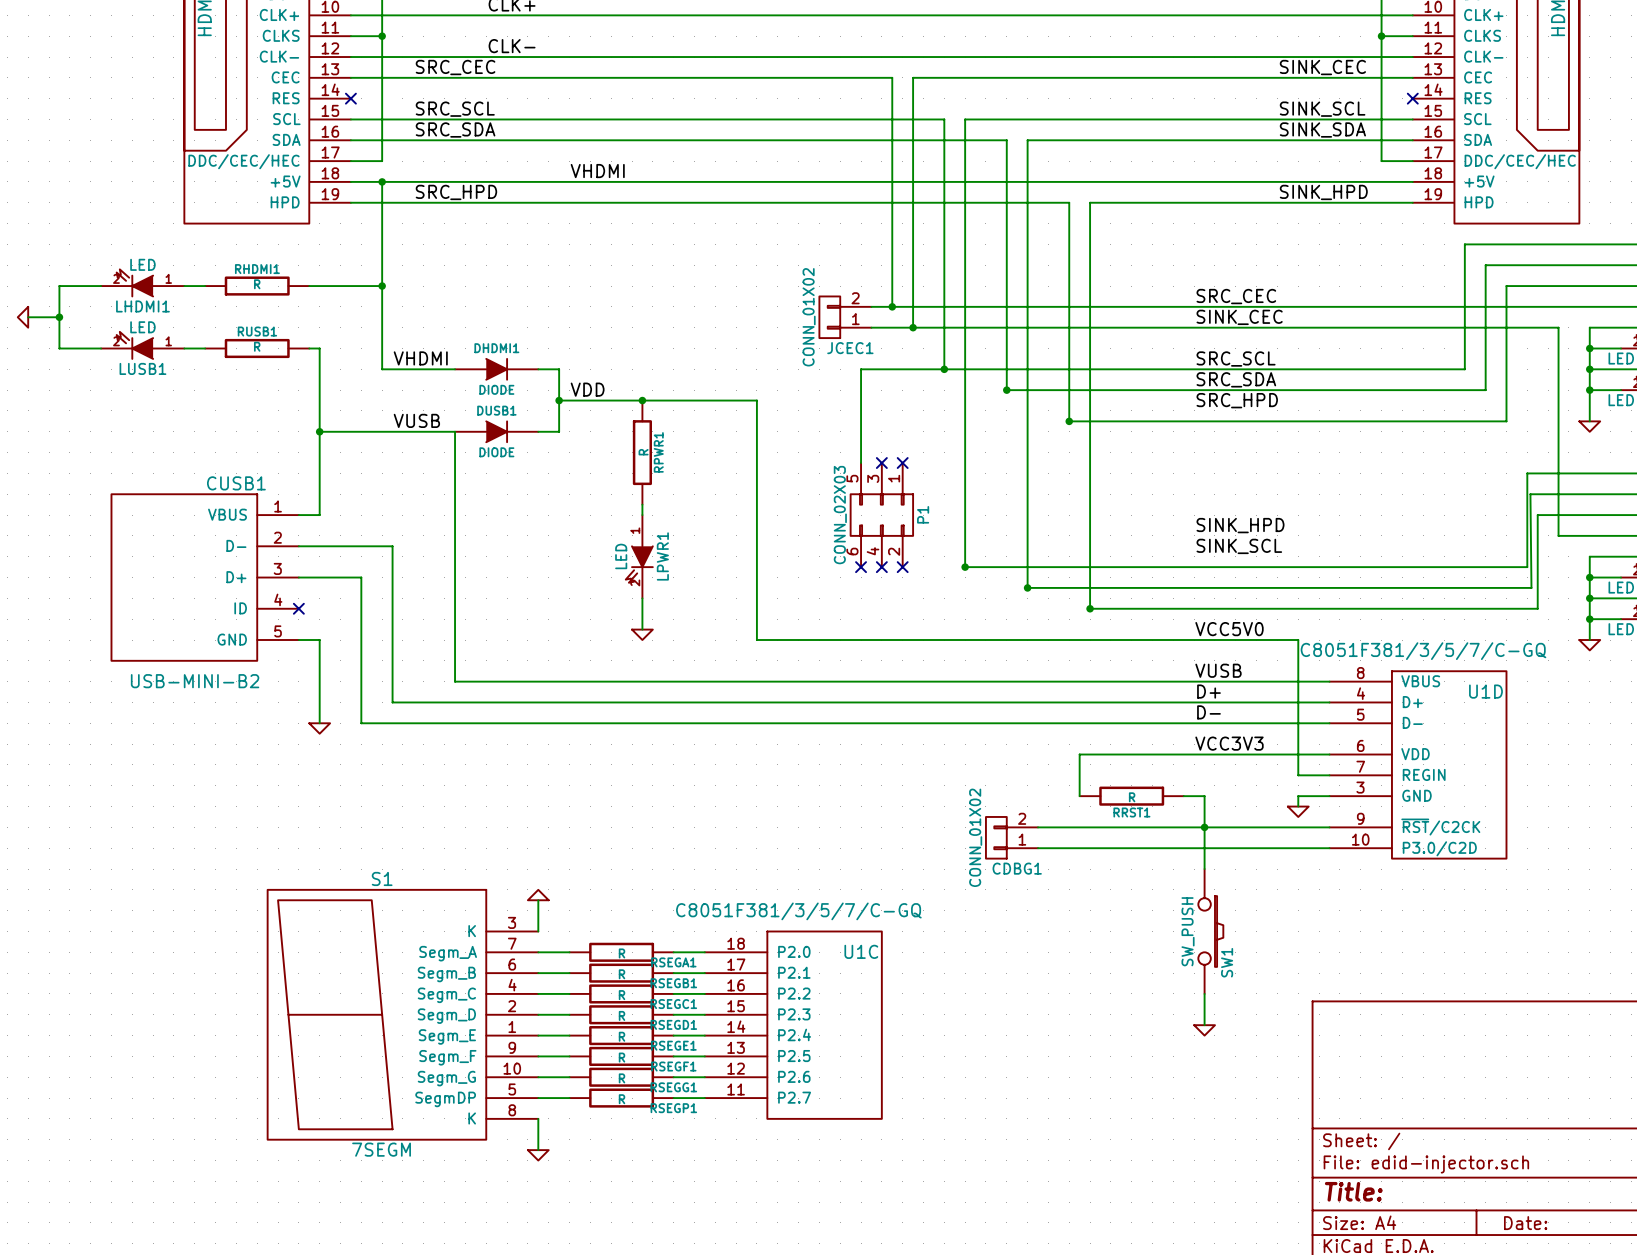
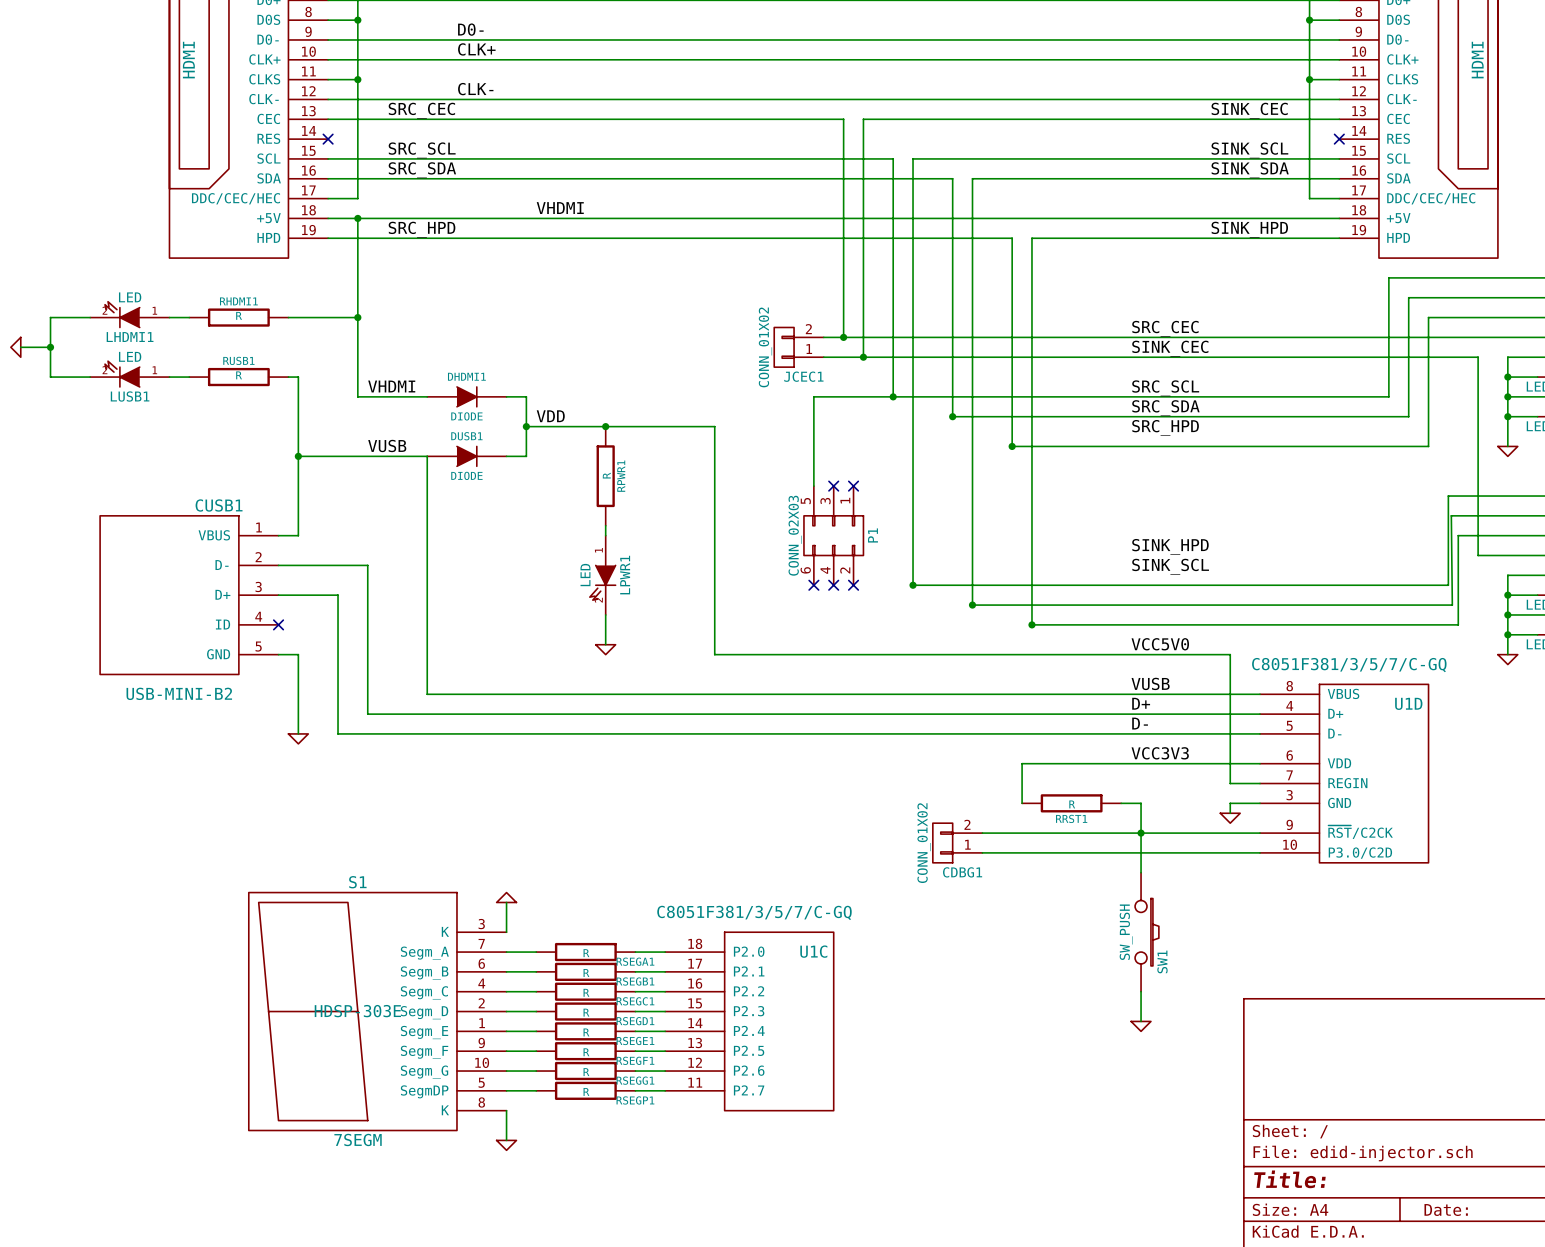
S1 text: none -> HDSP-303E (357, 1011)

